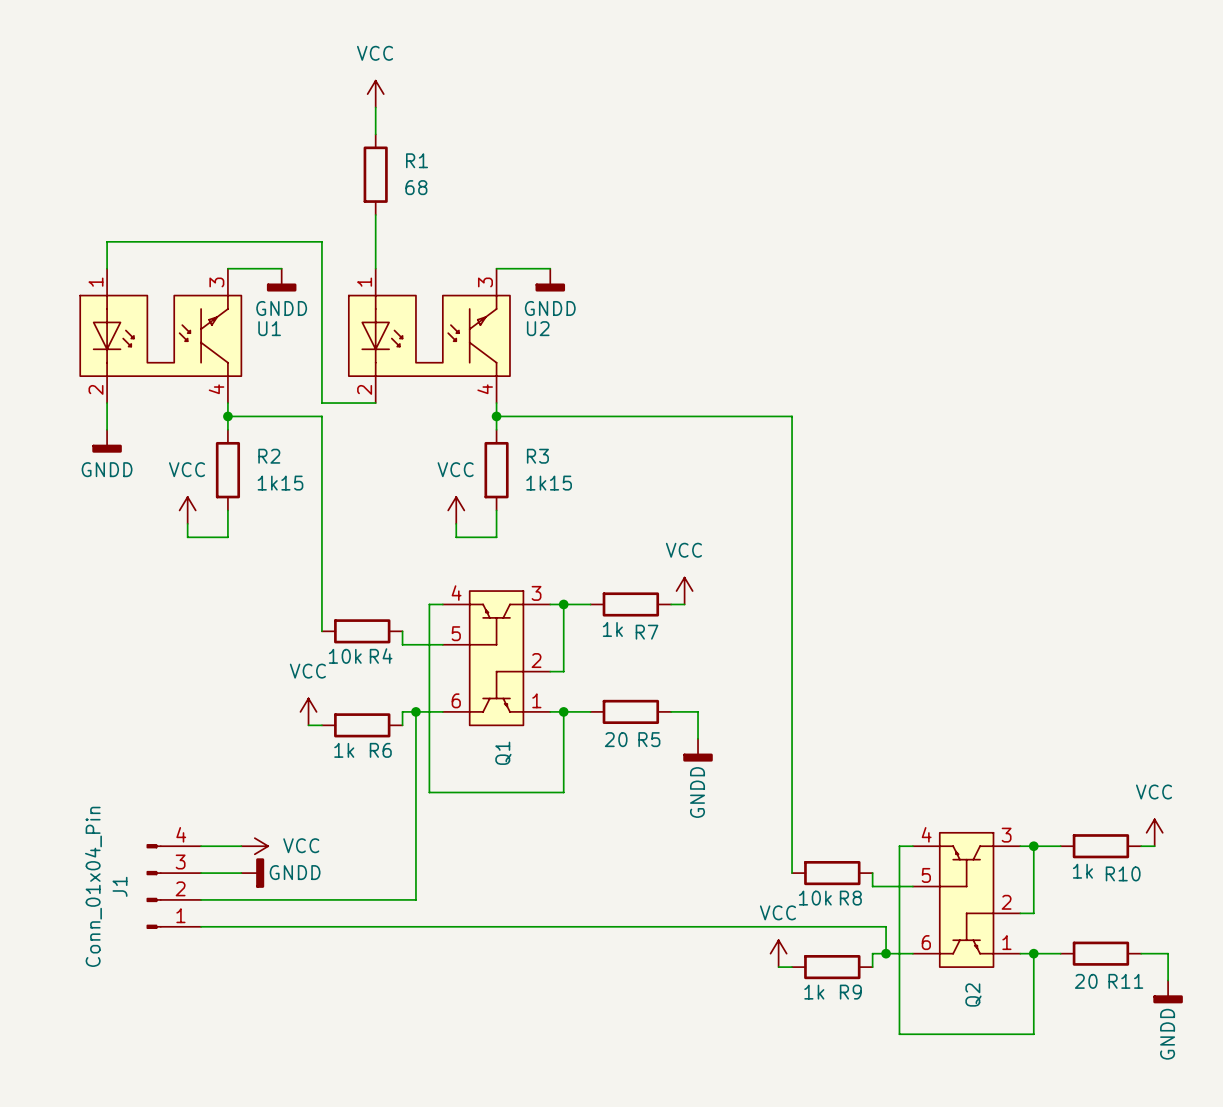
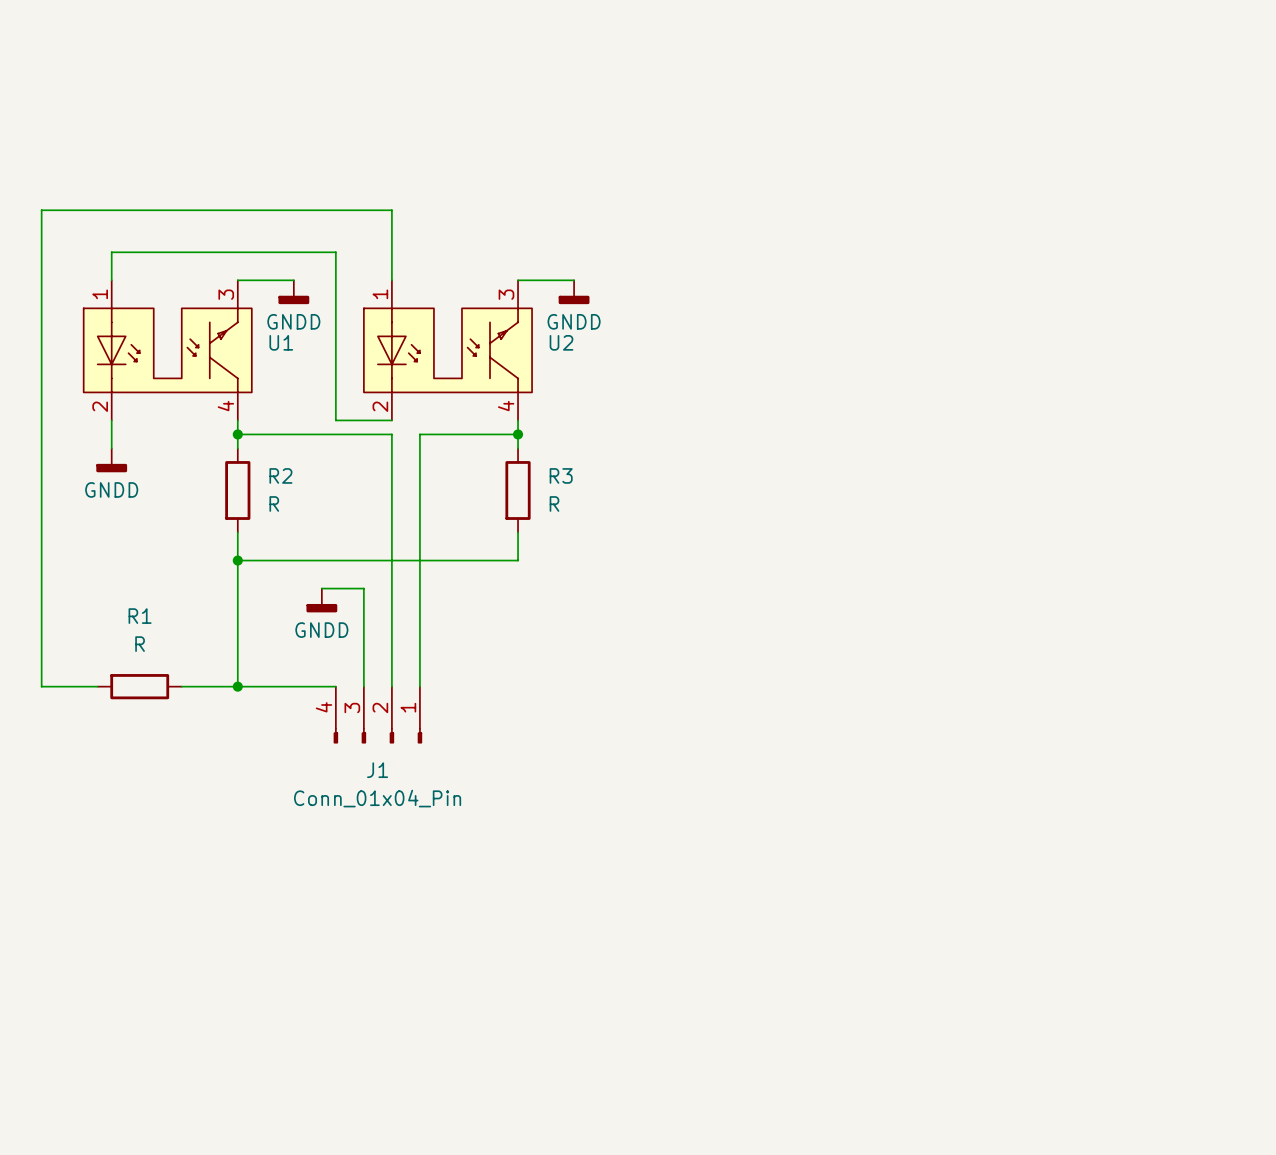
power symbol: VCC (375, 94) -> none
wire: (375, 107) (375, 134) -> none
R1 name position: R1 (417, 160) -> R1 (140, 616)
R1 rotation: 0° (375, 174) -> 90° clockwise (139, 686)
R1 position: (375, 174) -> (139, 686)
R1 value: 68 (416, 187) -> R (140, 644)
wire: none -> (391, 224) (391, 210) (41, 210) (41, 686) (97, 686)
wire: (321, 416) (321, 631) -> (335, 434) (391, 434) (391, 686)
wire: (496, 416) (792, 416) (792, 873) -> (518, 434) (419, 434) (419, 658)
R2 value: 1k15 (280, 483) -> R (274, 503)
R3 value: 1k15 (549, 483) -> R (554, 503)
power symbol: VCC (187, 510) -> none
power symbol: VCC (456, 510) -> none
wire: (187, 523) (187, 537) (227, 537) -> none
wire: (456, 523) (456, 537) -> (237, 686) (237, 560) (475, 560)
junction: none -> (237, 560)
wire: none -> (321, 588) (363, 588) (363, 686)
power symbol: none -> GNDD (321, 600)
power symbol: VCC (684, 591) -> none
wire: (442, 604) (429, 604) (429, 792) (563, 792) (563, 711) -> none
wire: (550, 604) (590, 604) -> none
wire: (563, 604) (563, 671) (550, 671) -> none
junction: (563, 604) -> none
R7: 1k (630, 604) -> none
wire: (671, 604) (684, 604) -> none
R4: 10k (362, 631) -> none
wire: (402, 644) (442, 644) -> (419, 672) (419, 686)
wire: none -> (181, 686) (335, 686)
junction: none -> (237, 686)
Q1: (496, 658) -> none
power symbol: VCC (308, 711) -> none
wire: (415, 711) (415, 899) (201, 899) -> none
junction: (415, 711) -> none
wire: (442, 711) (402, 711) (402, 725) -> none
wire: (550, 711) (590, 711) -> none
junction: (563, 711) -> none
R5: 20 (630, 711) -> none
wire: (671, 711) (698, 711) (698, 738) -> none
wire: (308, 725) (321, 725) -> none
R6: 1k (362, 725) -> none
power symbol: GNDD (698, 750) -> none
power symbol: VCC (1154, 832) -> none
wire: (201, 846) (241, 846) -> none
power symbol: VCC (254, 846) -> none
wire: (912, 846) (899, 846) (899, 1034) (1033, 1034) (1033, 953) -> none
wire: (1020, 846) (1060, 846) -> none
wire: (1033, 846) (1033, 913) (1020, 913) -> none
junction: (1033, 846) -> none
R10: 1k (1100, 846) -> none
wire: (1141, 846) (1154, 846) -> none
wire: (201, 873) (241, 873) -> none
power symbol: GNDD (252, 873) -> none
R8: 10k (832, 873) -> none
wire: (872, 873) (872, 886) (912, 886) -> none
J1 rotation: 0° (154, 886) -> 90° counterclockwise (377, 735)
J1 position: (173, 886) -> (377, 715)
Q2: (966, 899) -> none
wire: (201, 926) (886, 926) (886, 953) -> none
power symbol: VCC (778, 953) -> none
junction: (886, 953) -> none
wire: (912, 953) (872, 953) (872, 967) -> none
wire: (1020, 953) (1060, 953) -> none
junction: (1033, 953) -> none
R11: 20 (1100, 953) -> none
wire: (1141, 953) (1168, 953) (1168, 980) -> none
wire: (778, 967) (792, 967) -> none
R9: 1k (832, 967) -> none
power symbol: GNDD (1168, 991) -> none

